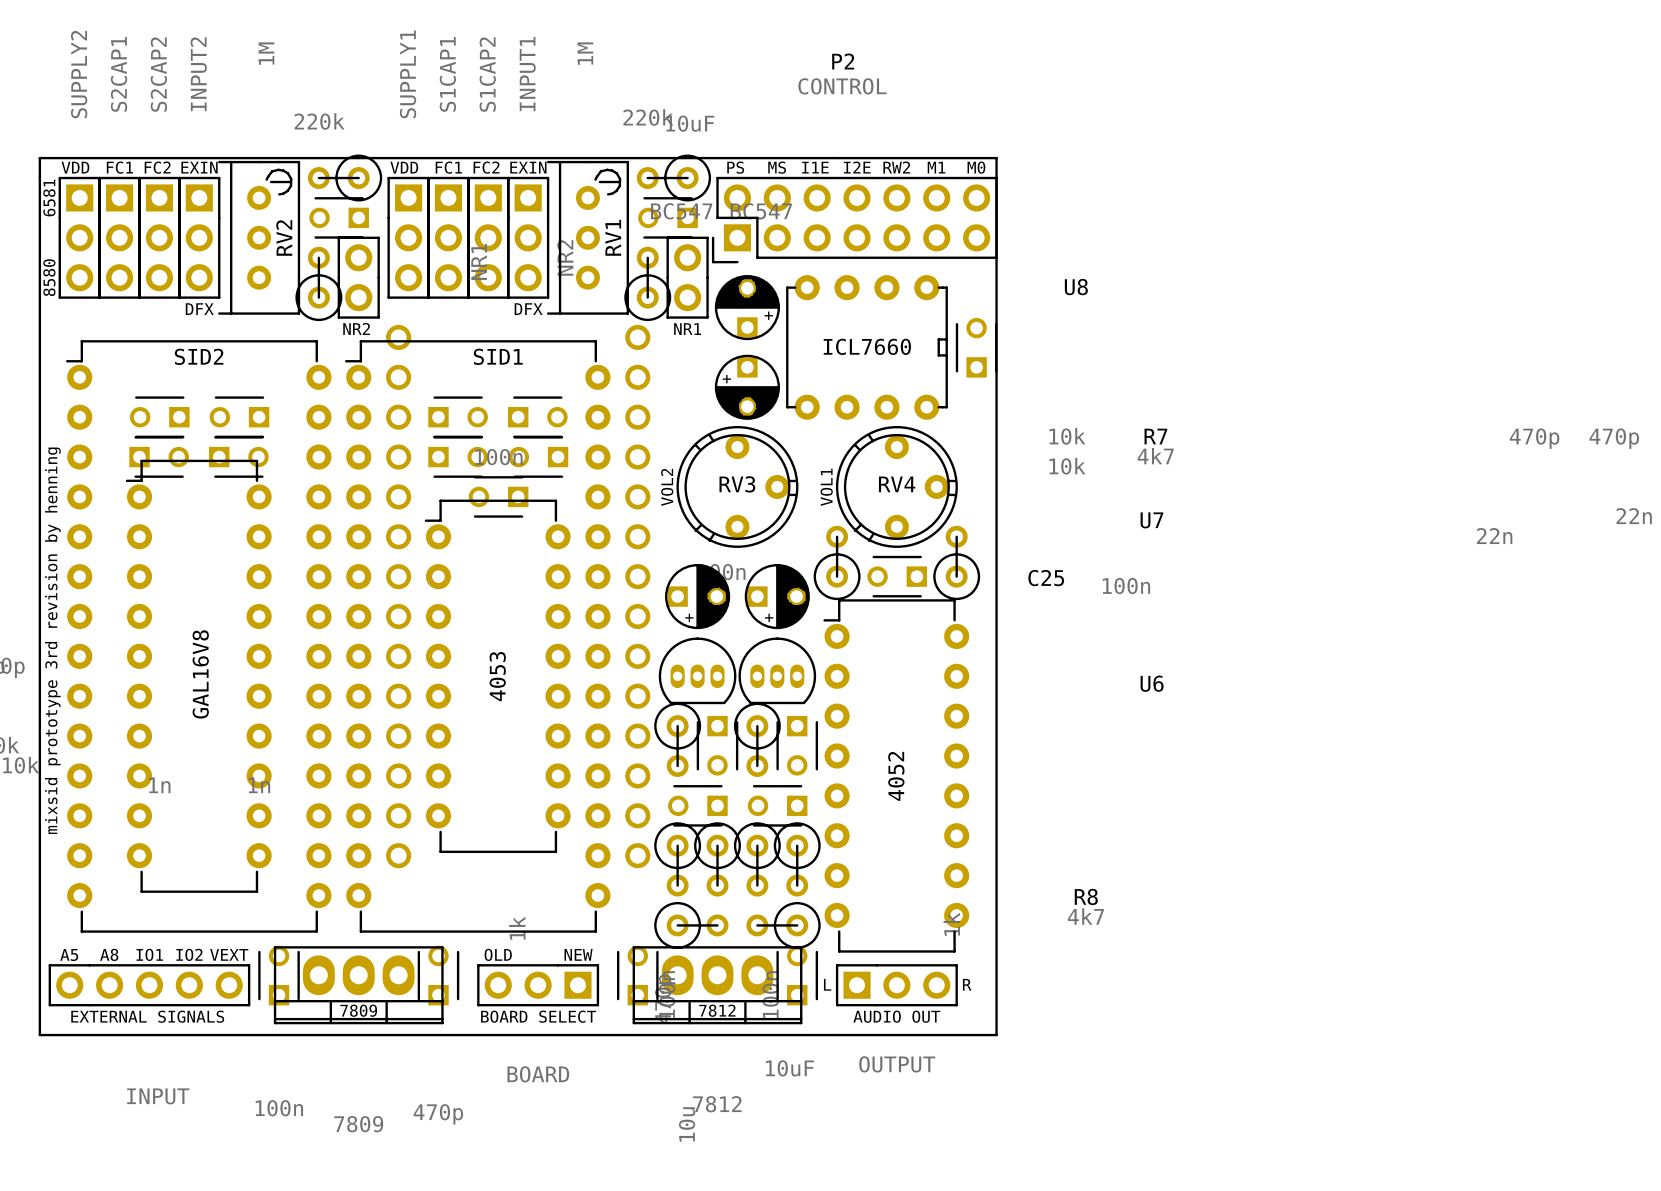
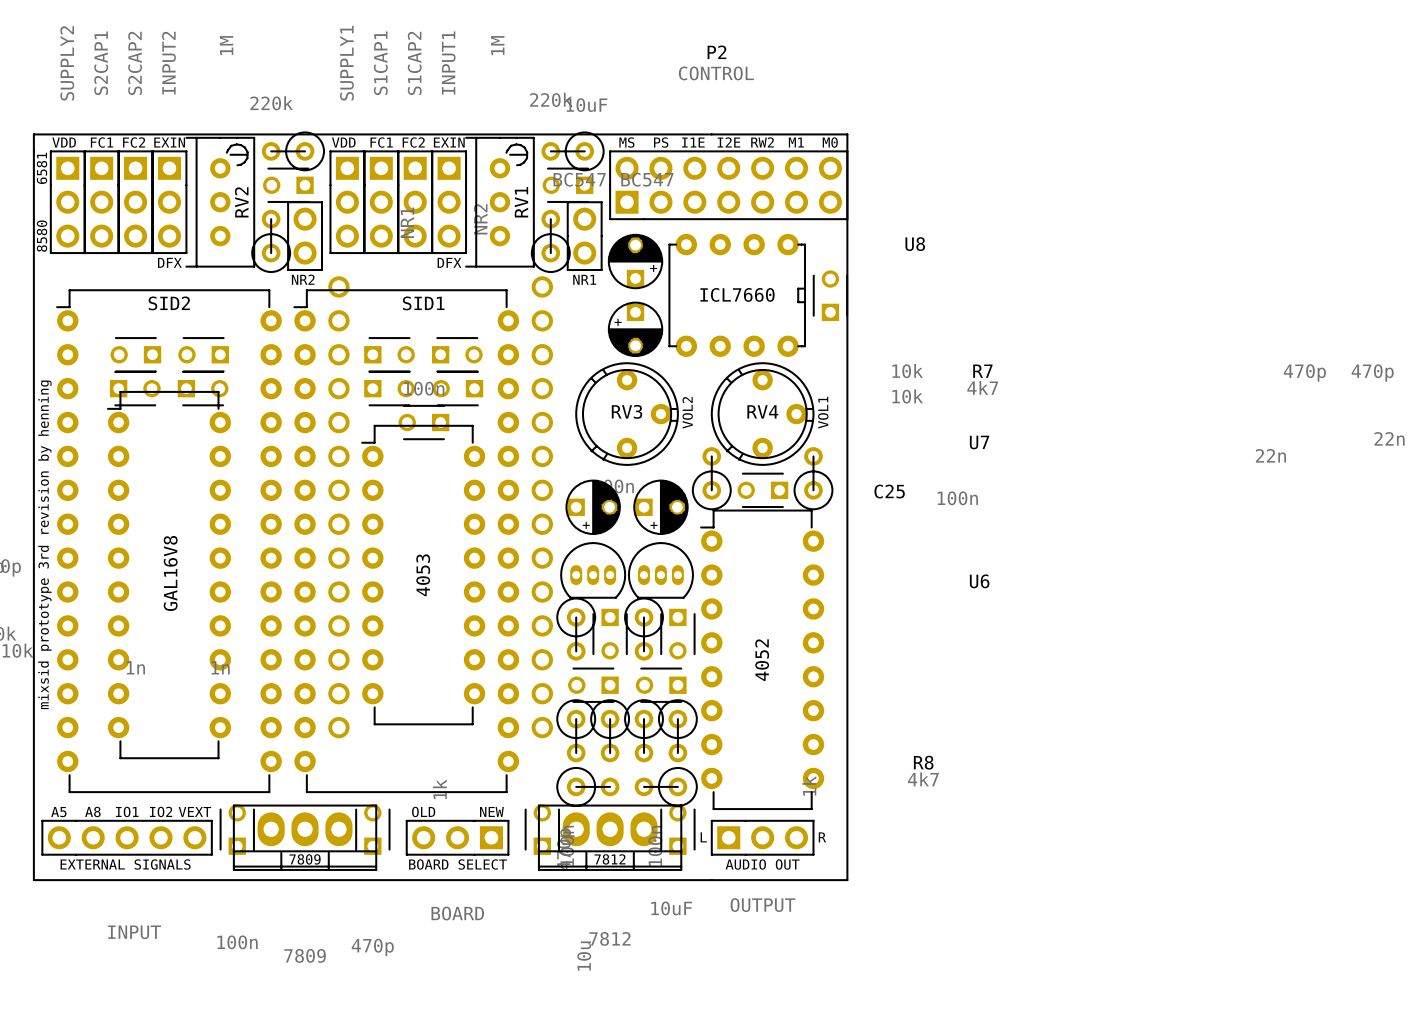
text: PS (735, 167) -> MS (626, 142)
text: MS (777, 167) -> PS (661, 142)
P2 footprint: [711, 176, 998, 264] -> [609, 150, 849, 221]
text position: VOL2 (667, 487) -> VOL2 (687, 412)
text position: VOL1 (826, 487) -> VOL1 (823, 412)

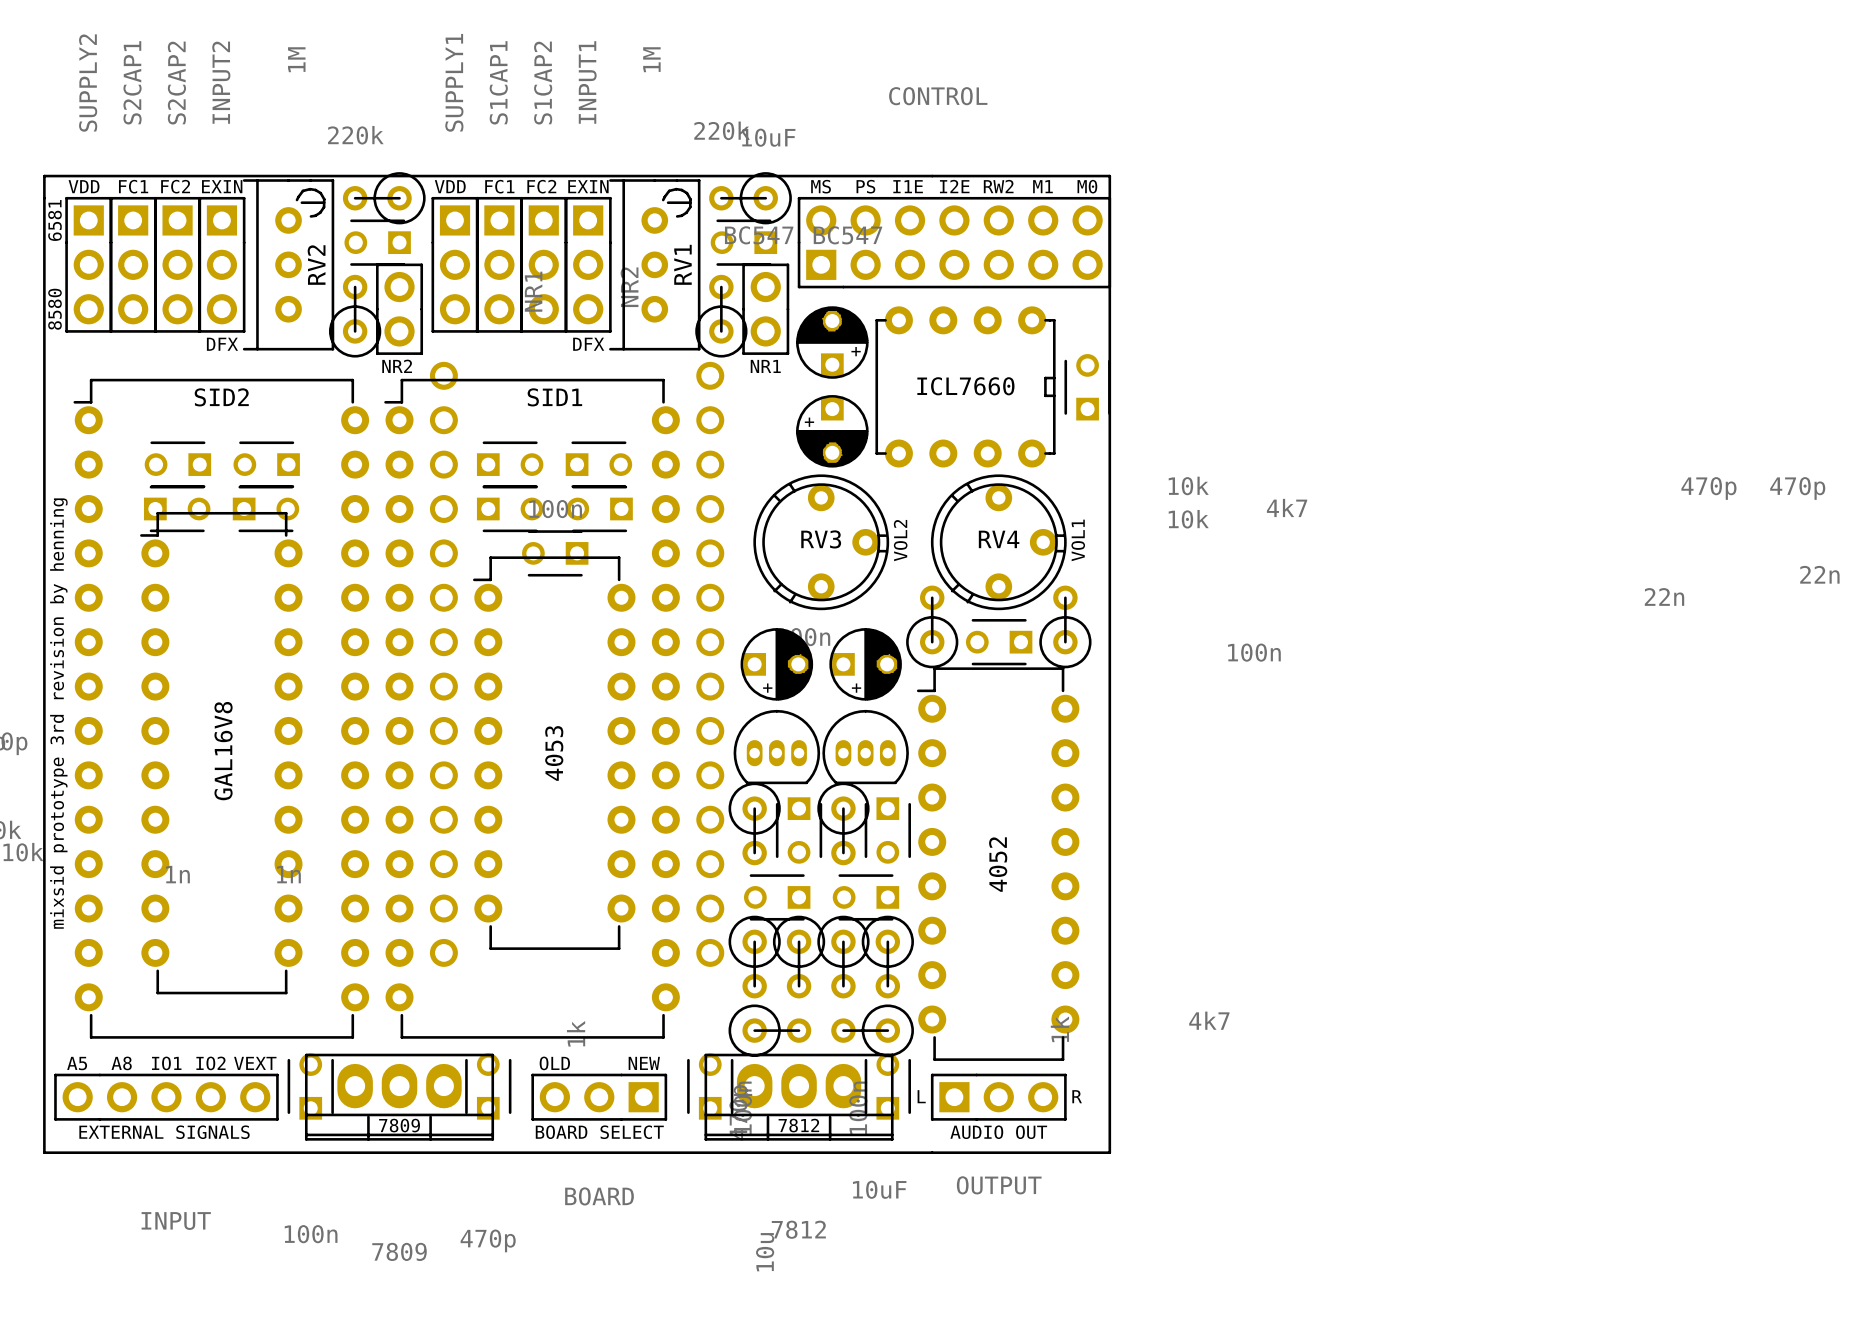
P2 name: P2 (716, 52) -> none
U8 name: U8 (915, 244) -> none
R7 name: R7 (982, 371) -> none
U7 name: U7 (979, 442) -> none
C25 name: C25 (889, 491) -> none
U6 name: U6 (979, 581) -> none
R8 name: R8 (923, 762) -> none

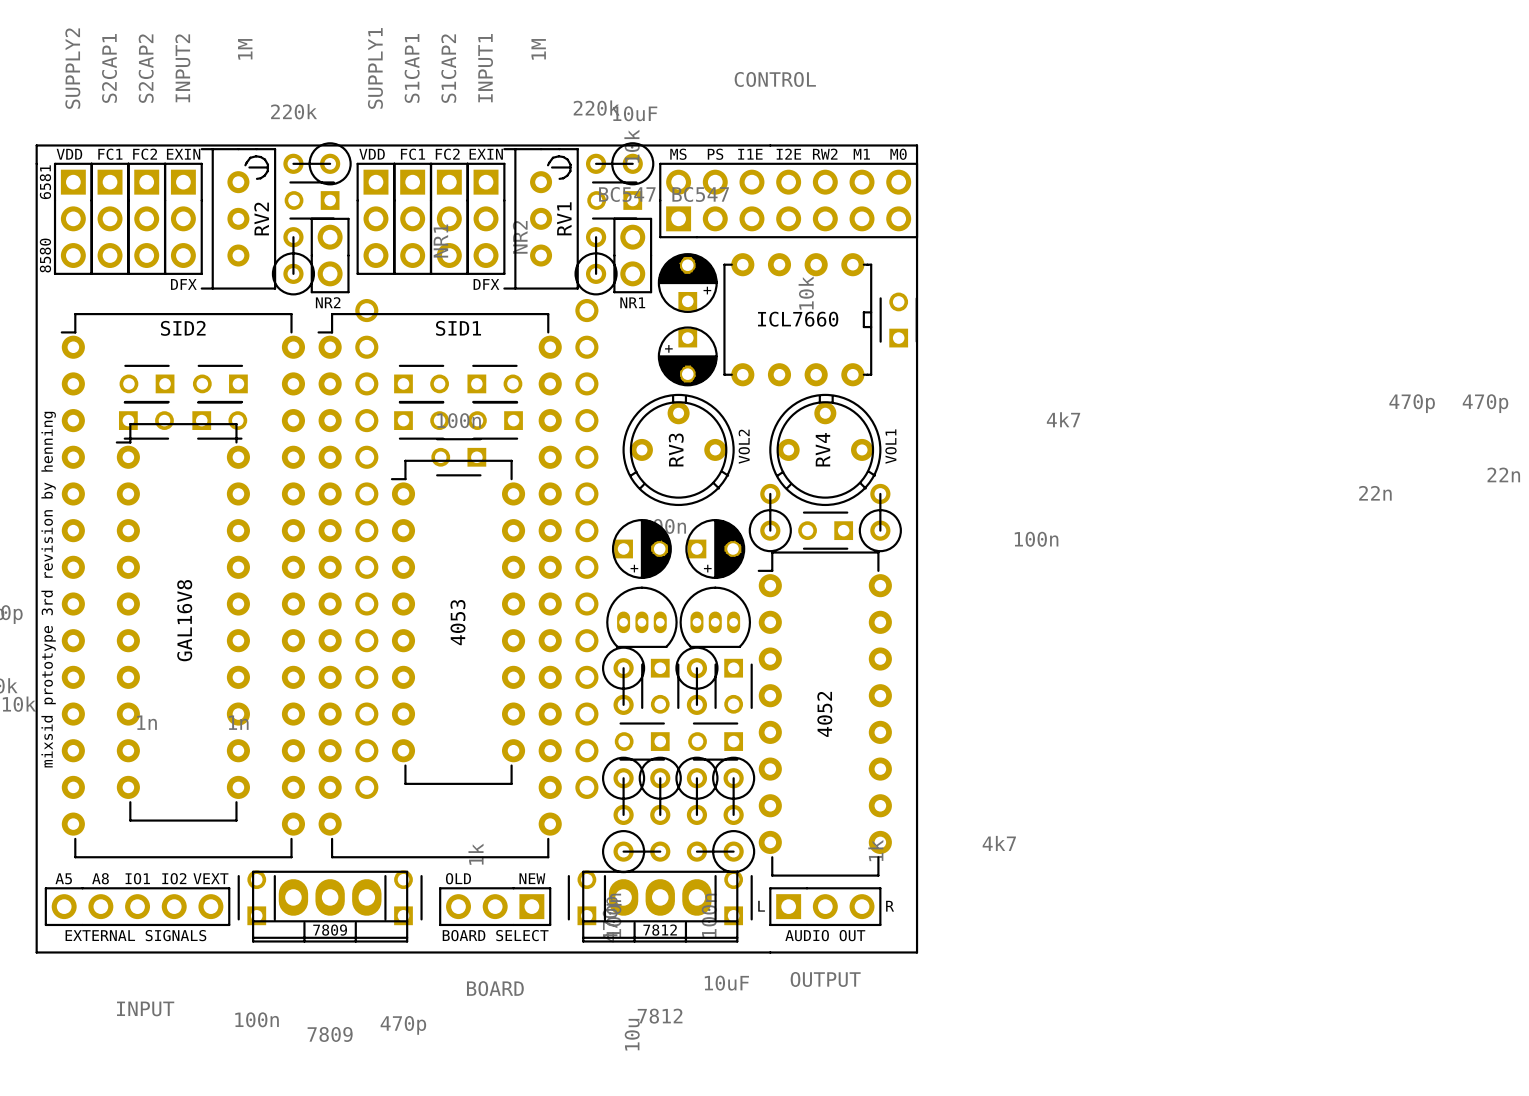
RV3 rotation: 0° (821, 542) -> 90° counterclockwise (678, 449)
RV4 rotation: 0° (998, 542) -> 90° counterclockwise (825, 449)

